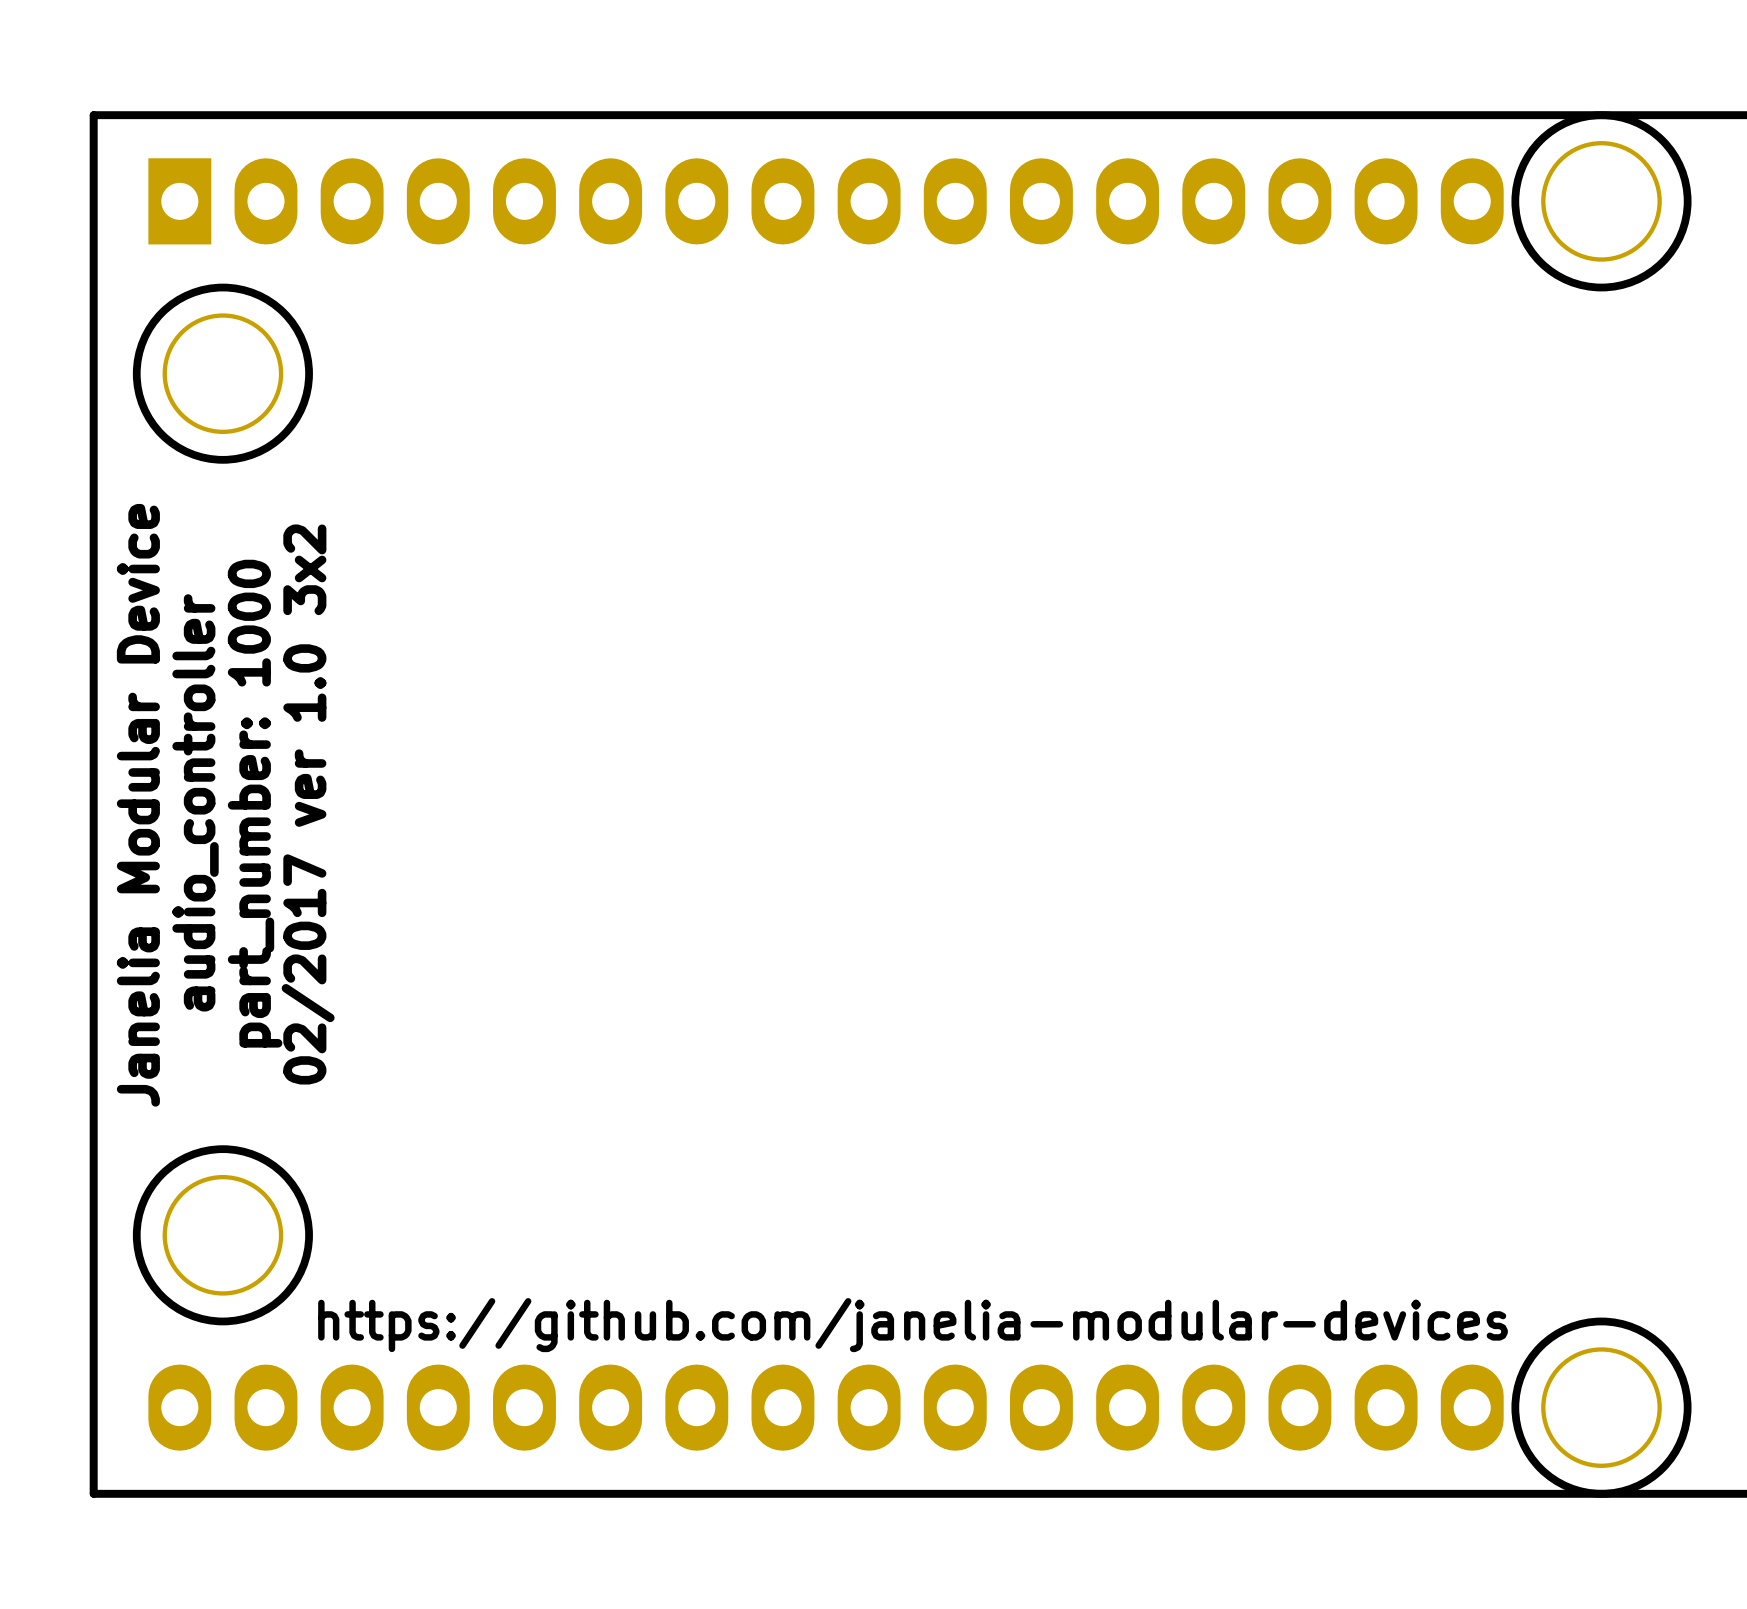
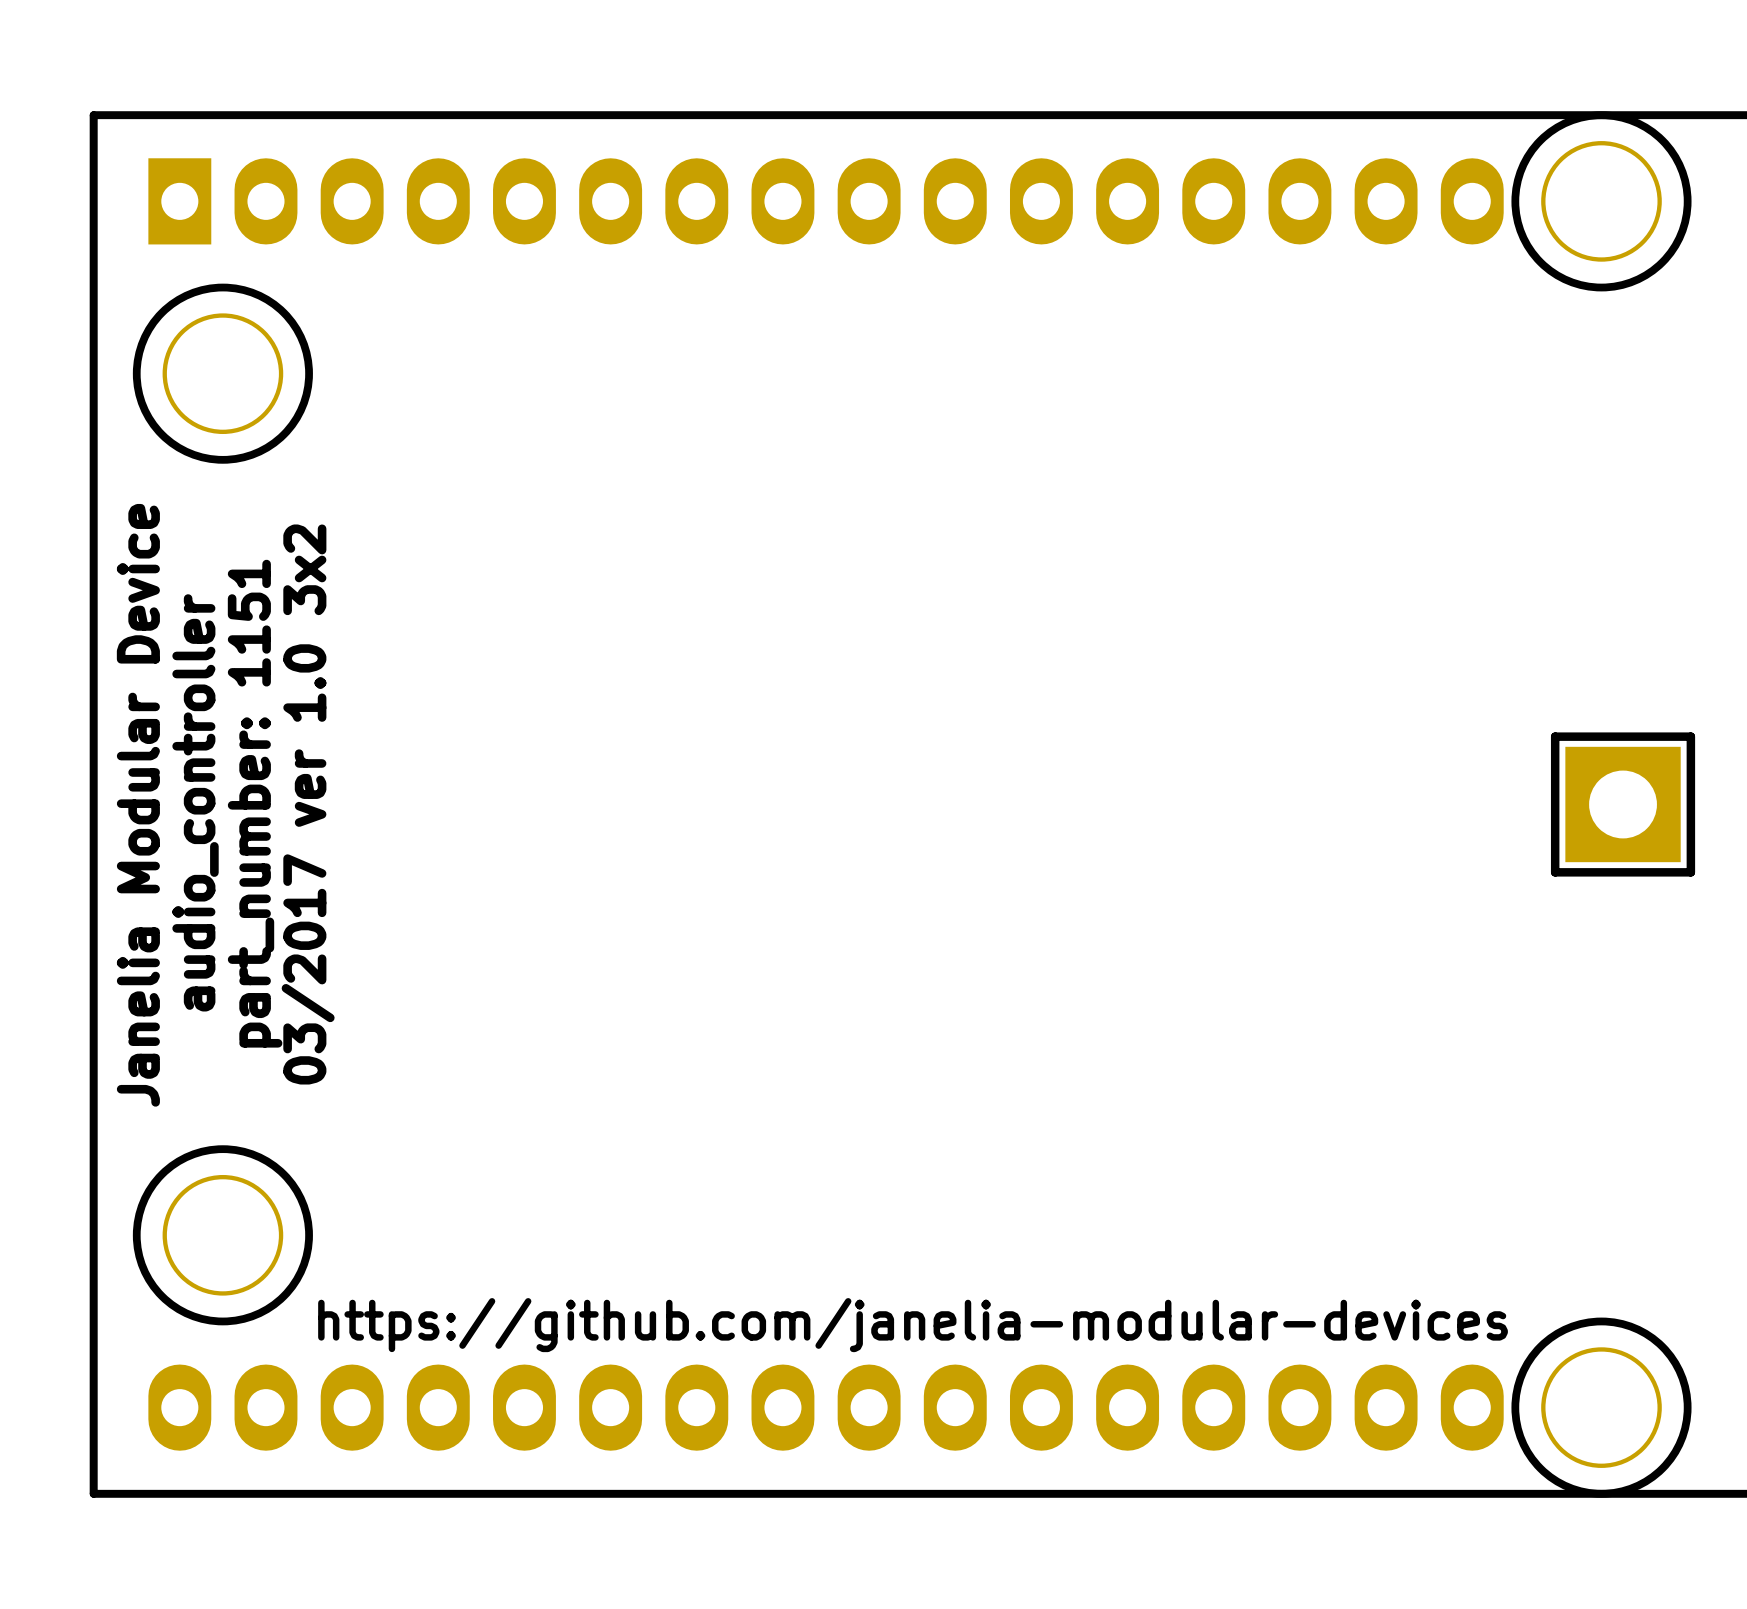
text: part_number: 1000 (255, 803) -> part_number: 1151 (255, 803)
text: 02/2017 ver 1.0 3x2 (308, 804) -> 03/2017 ver 1.0 3x2 (308, 804)
part: none -> (1623, 804)

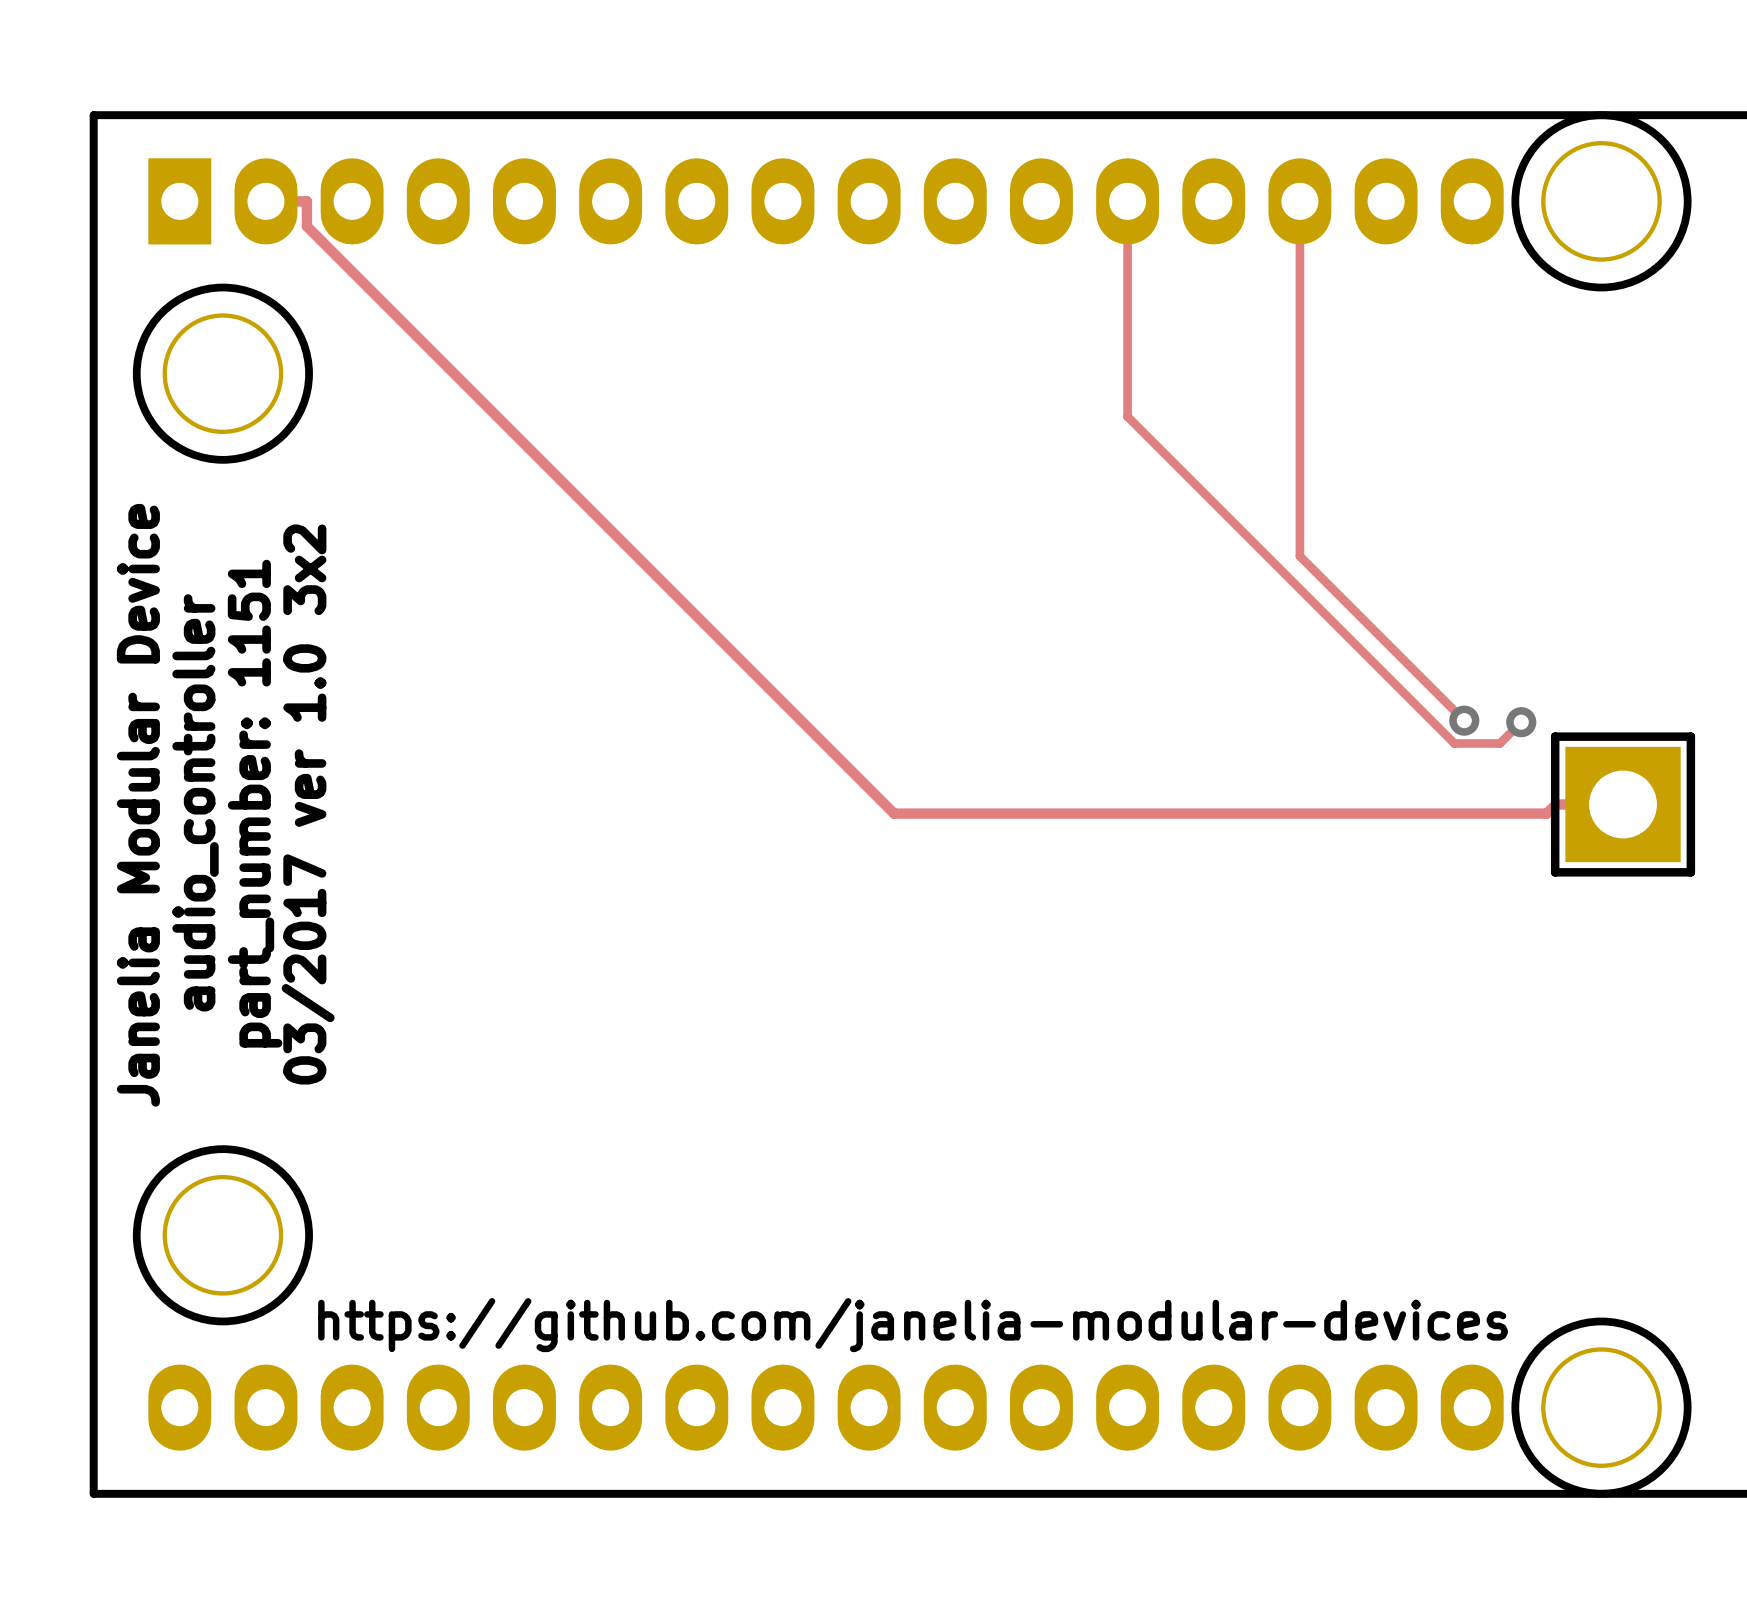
track: none -> (265, 201) (306, 201) (306, 226) (894, 813) (1546, 813) (1555, 804) (1623, 804)
track: none -> (1127, 201) (1127, 416) (1454, 743) (1499, 743) (1521, 722)
track: none -> (1299, 201) (1299, 556) (1464, 720)
via: none -> (1464, 720)
via: none -> (1521, 722)

